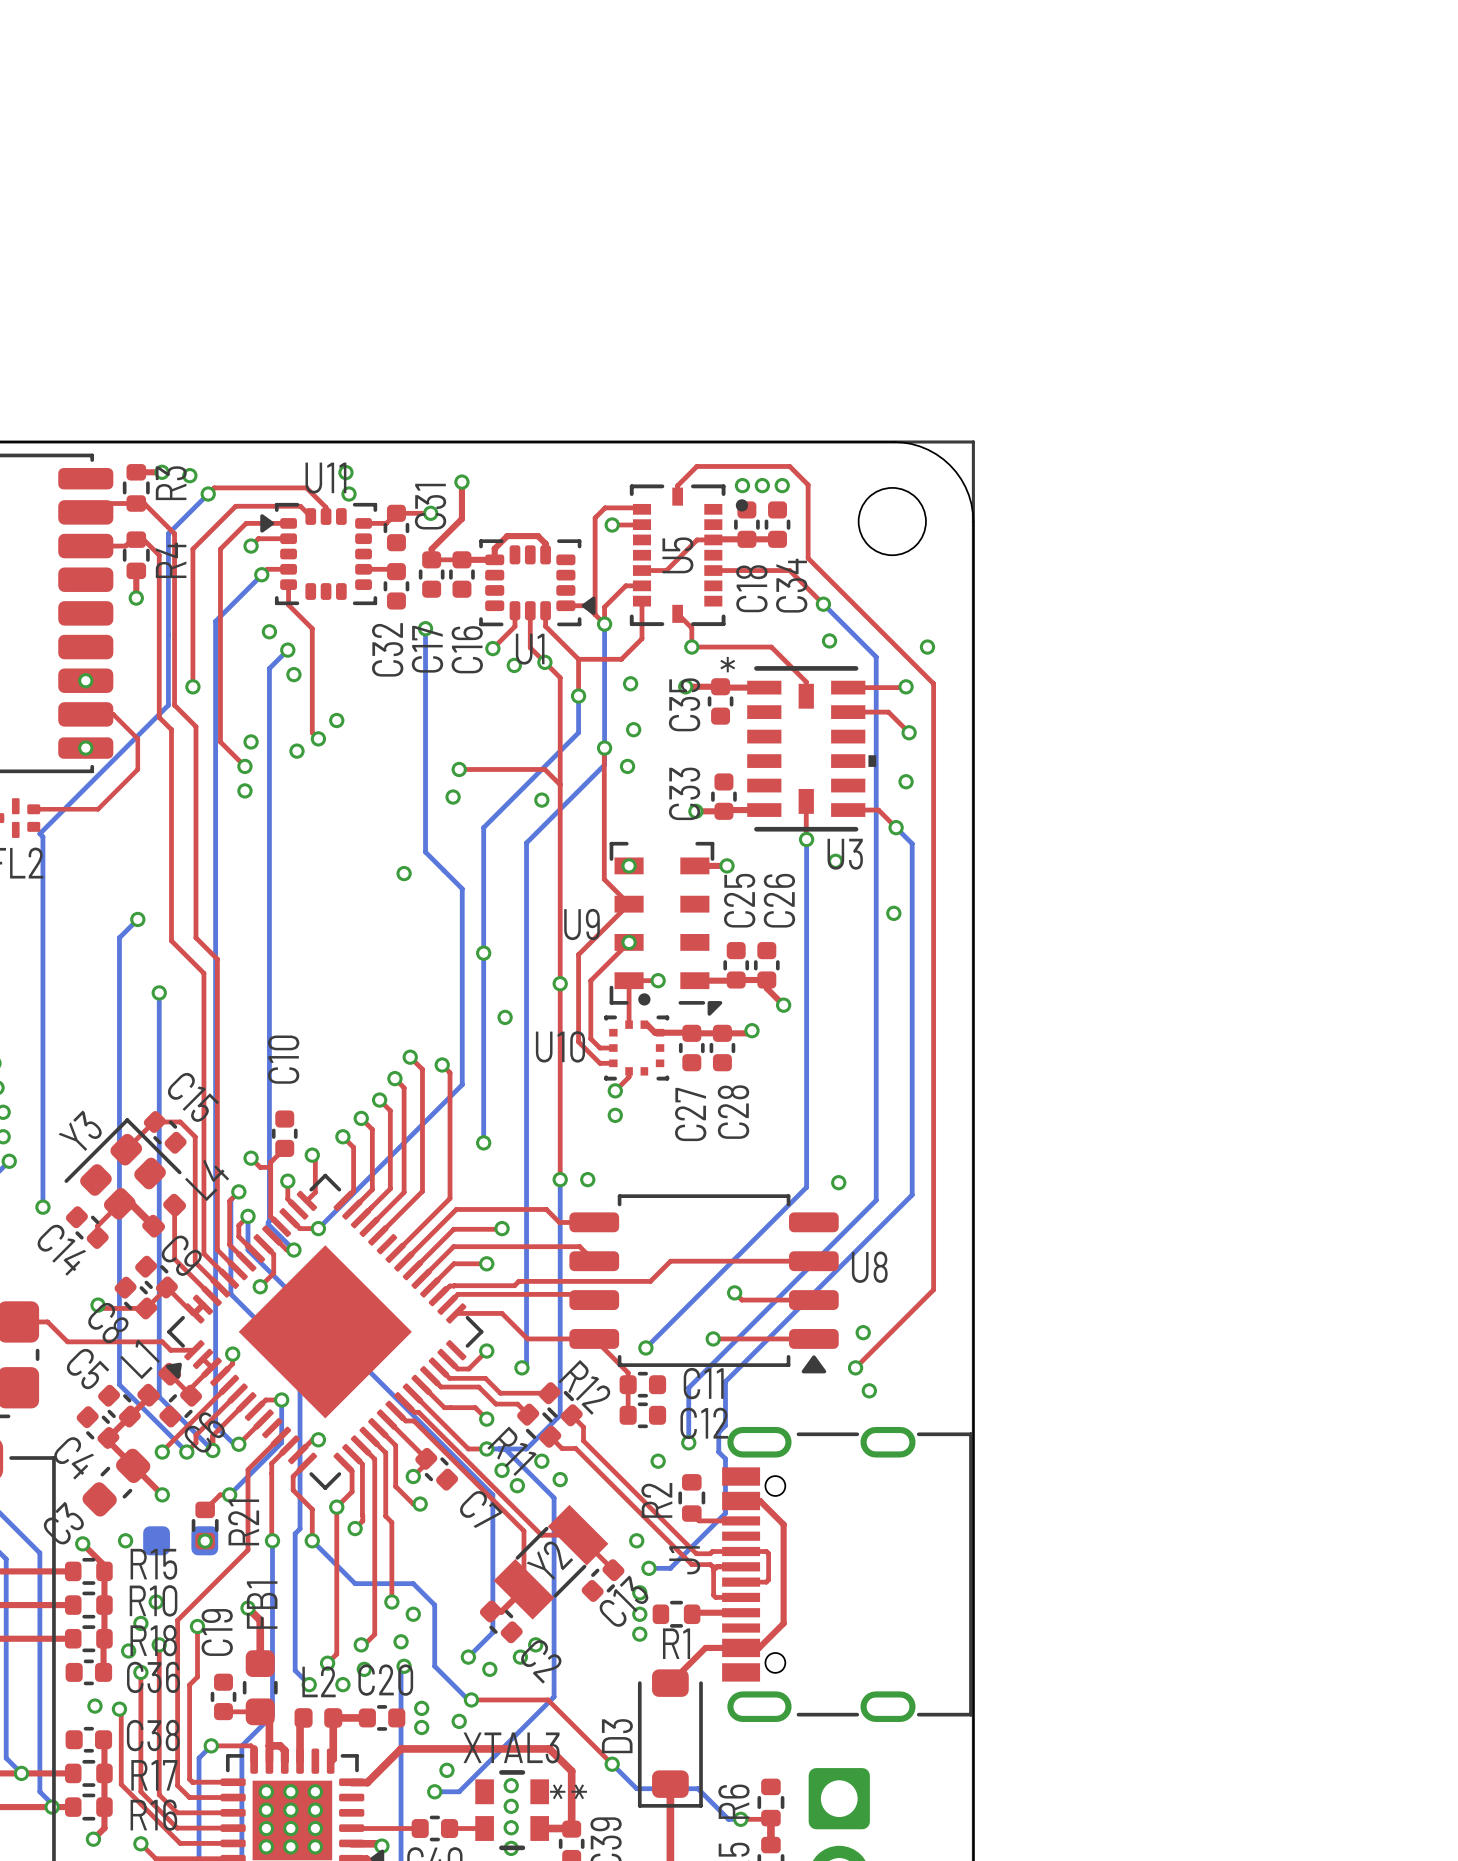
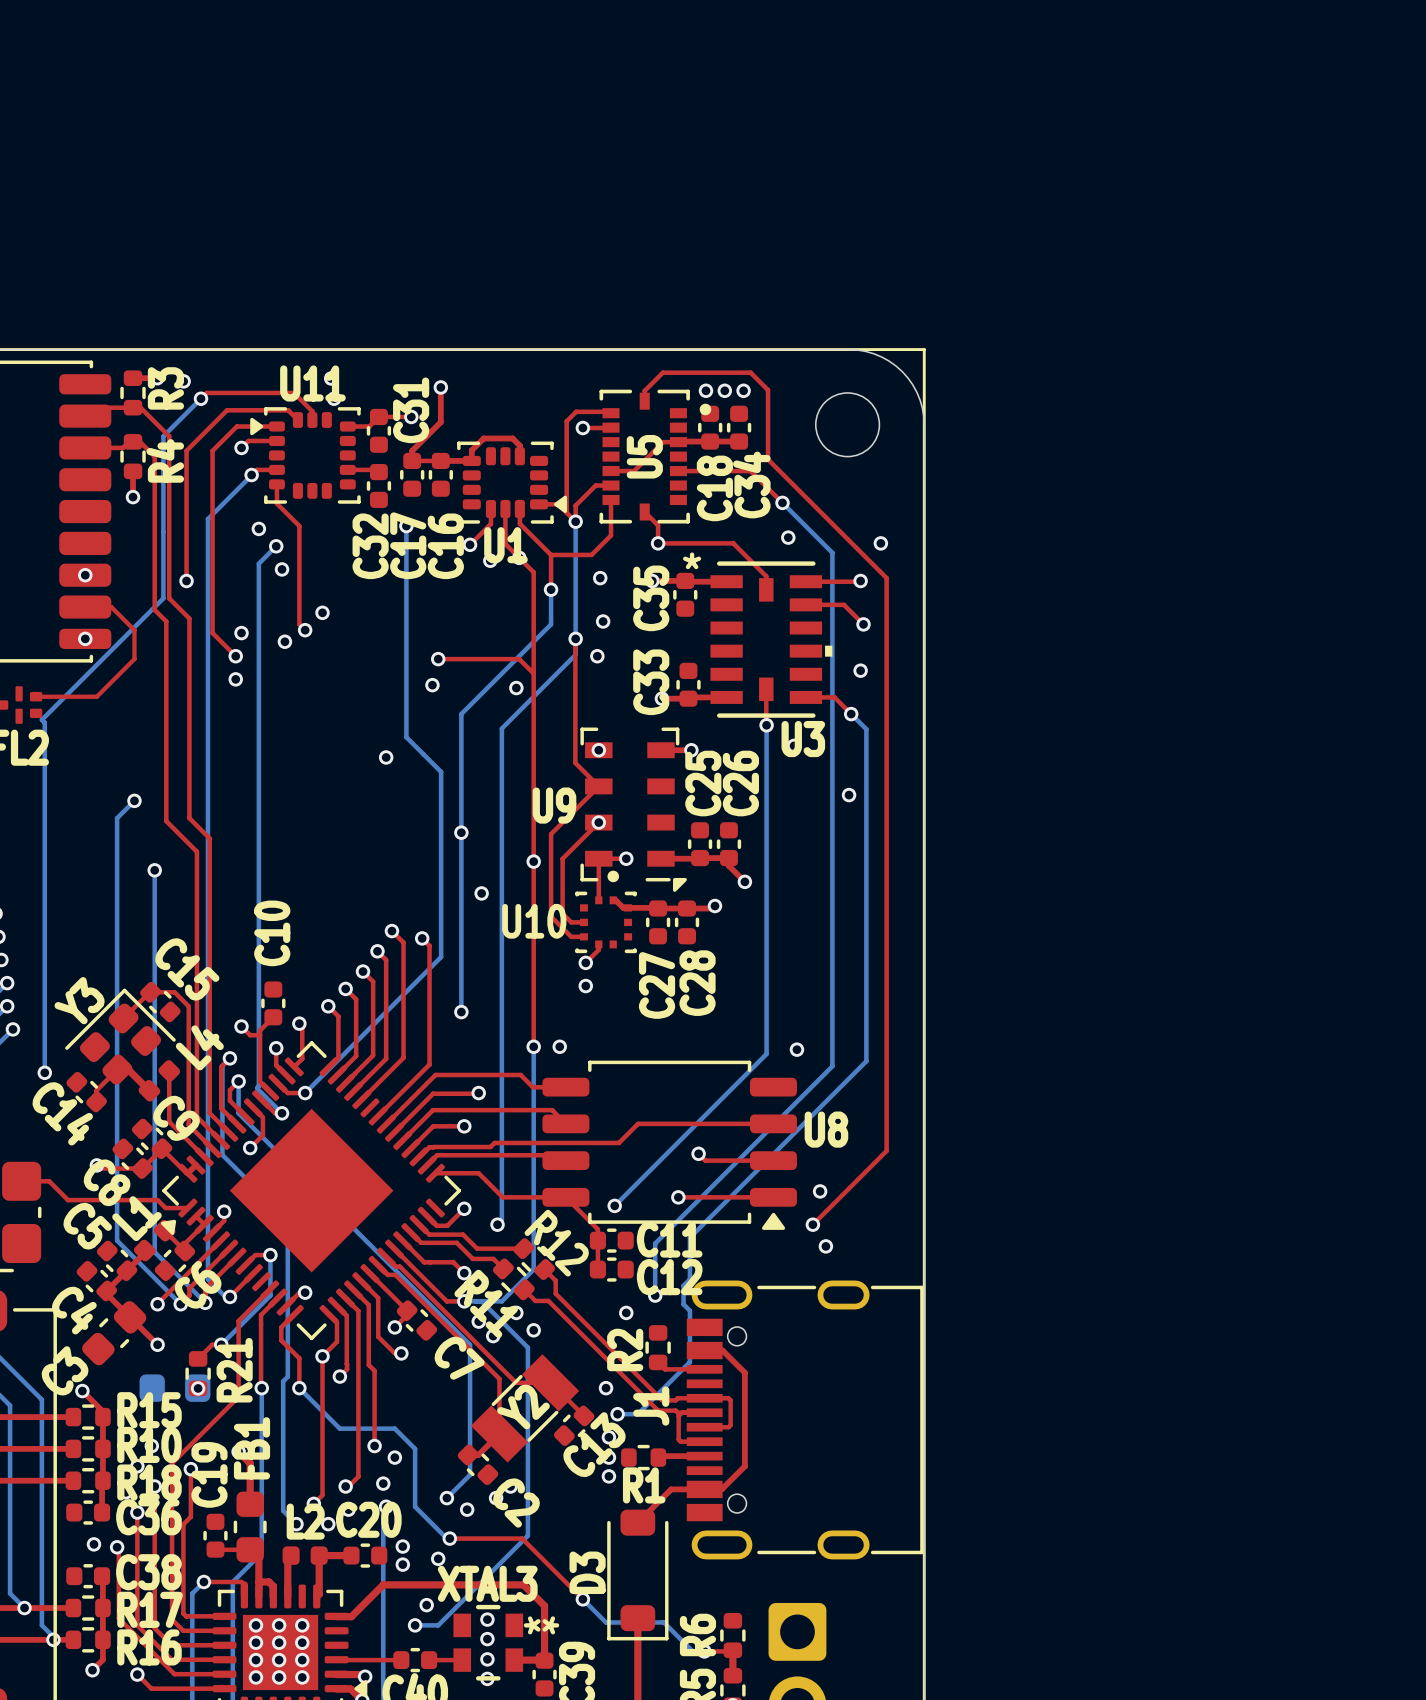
via: (125, 1540) -> none

